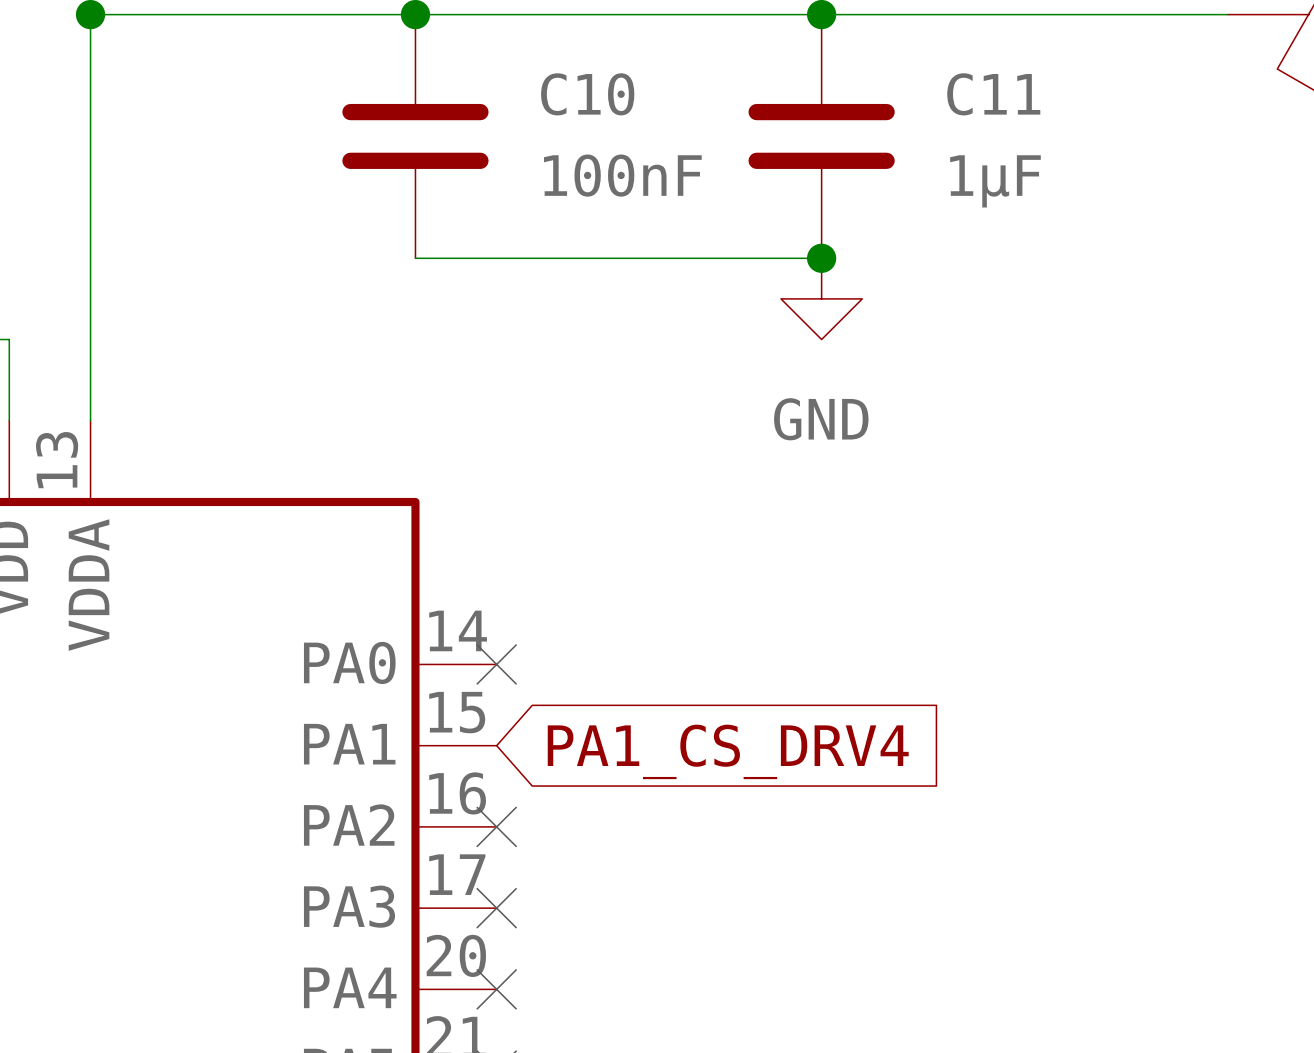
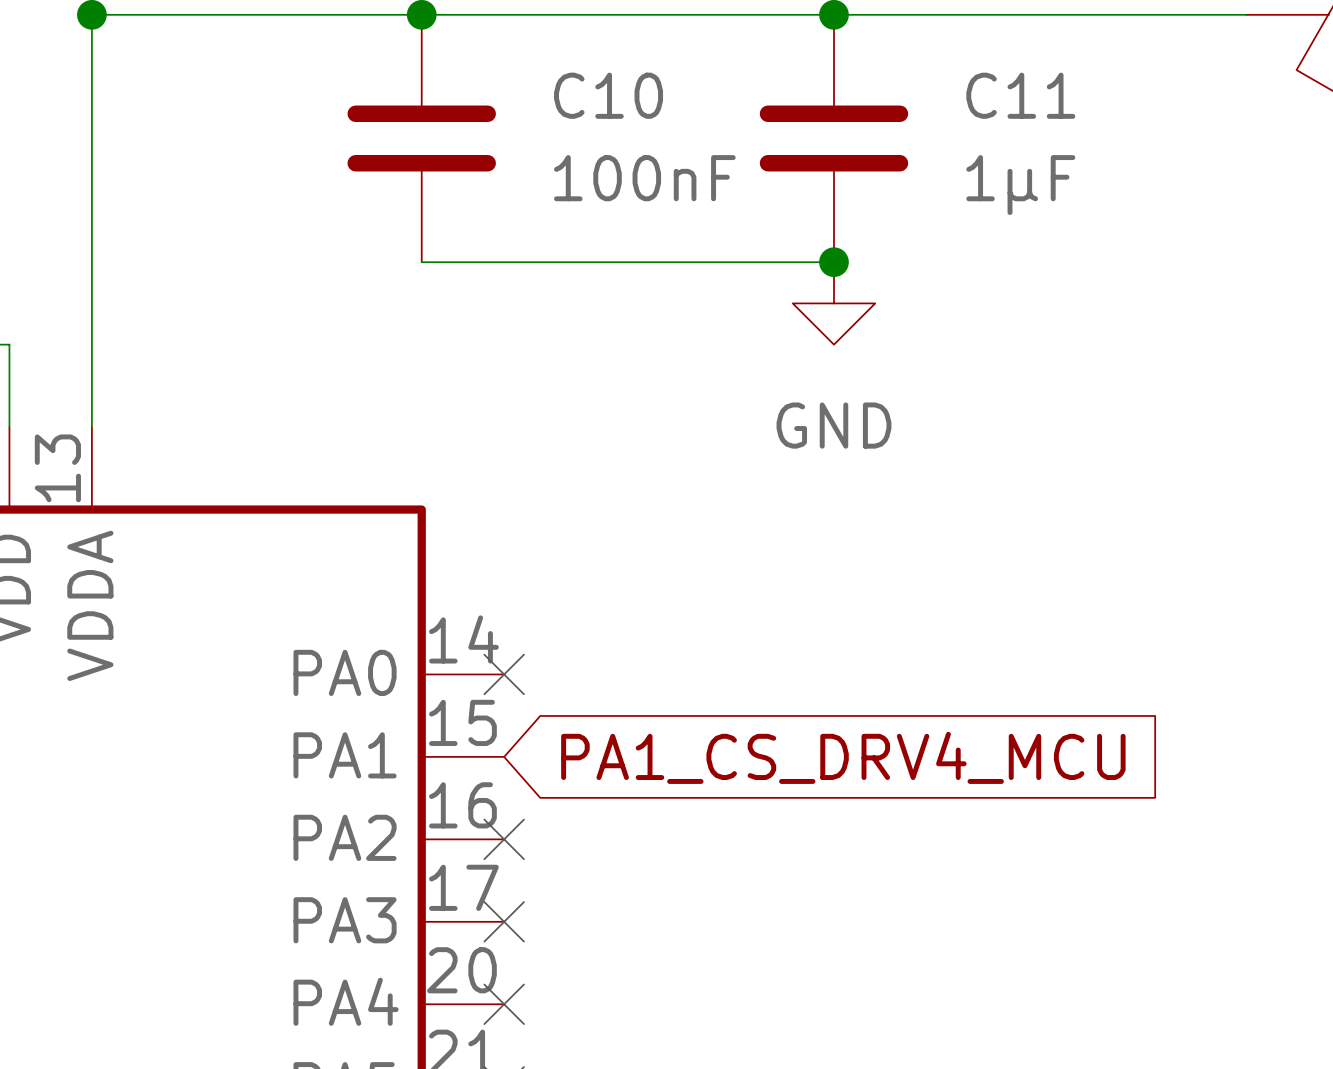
global label: PA1_CS_DRV4 (728, 751) -> PA1_CS_DRV4_MCU (843, 757)

